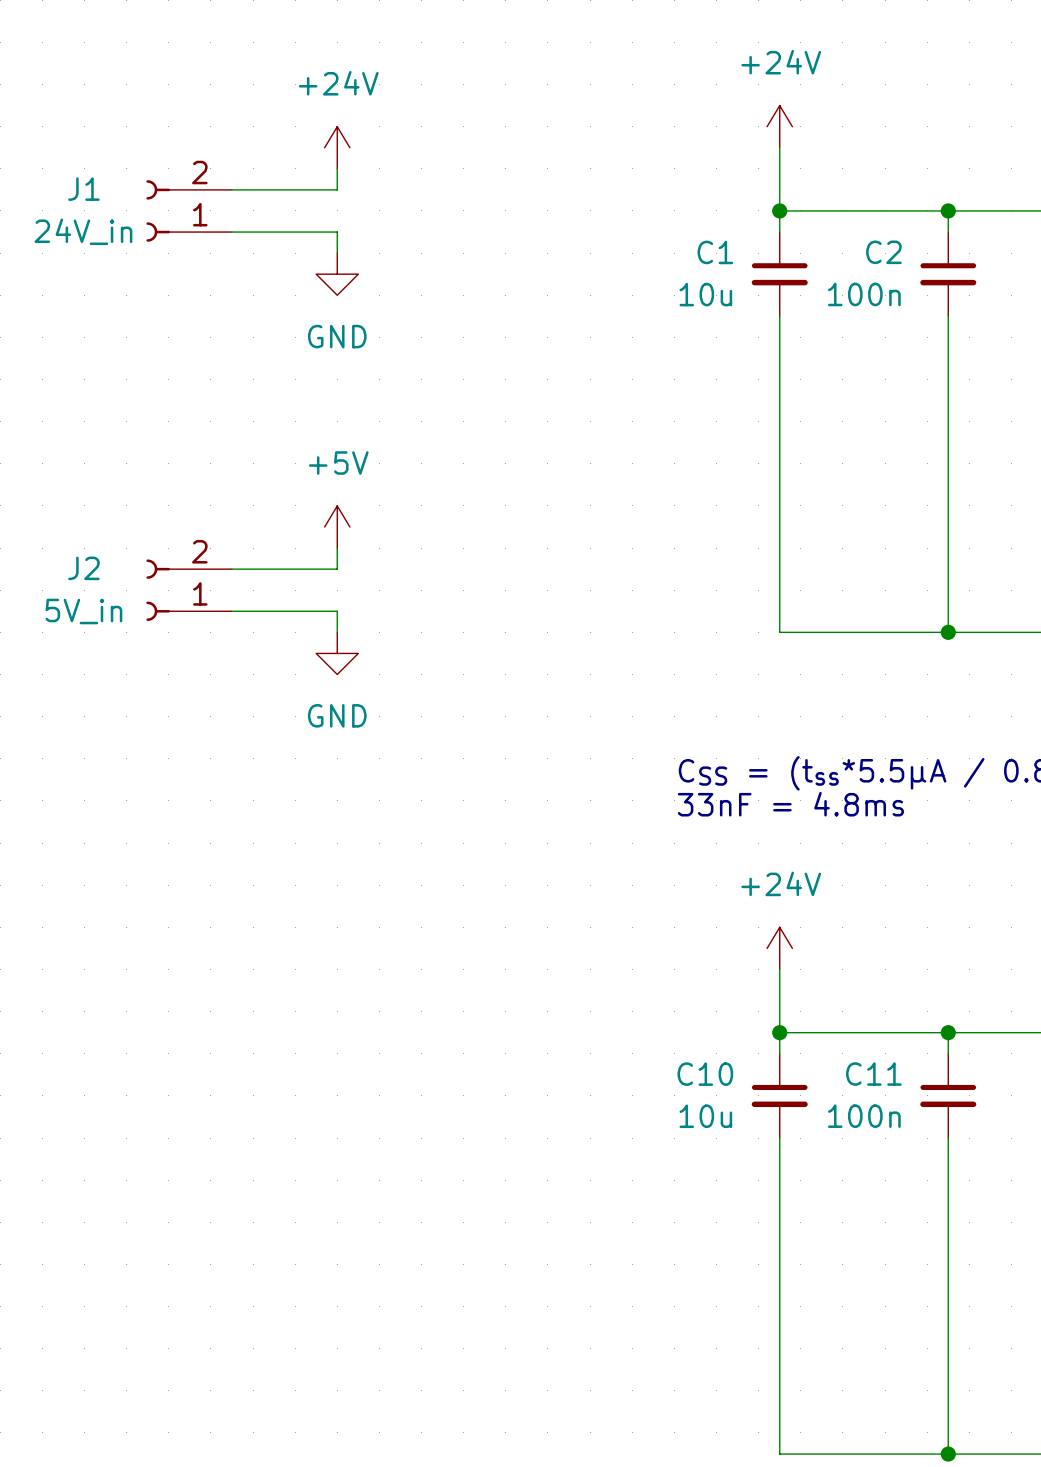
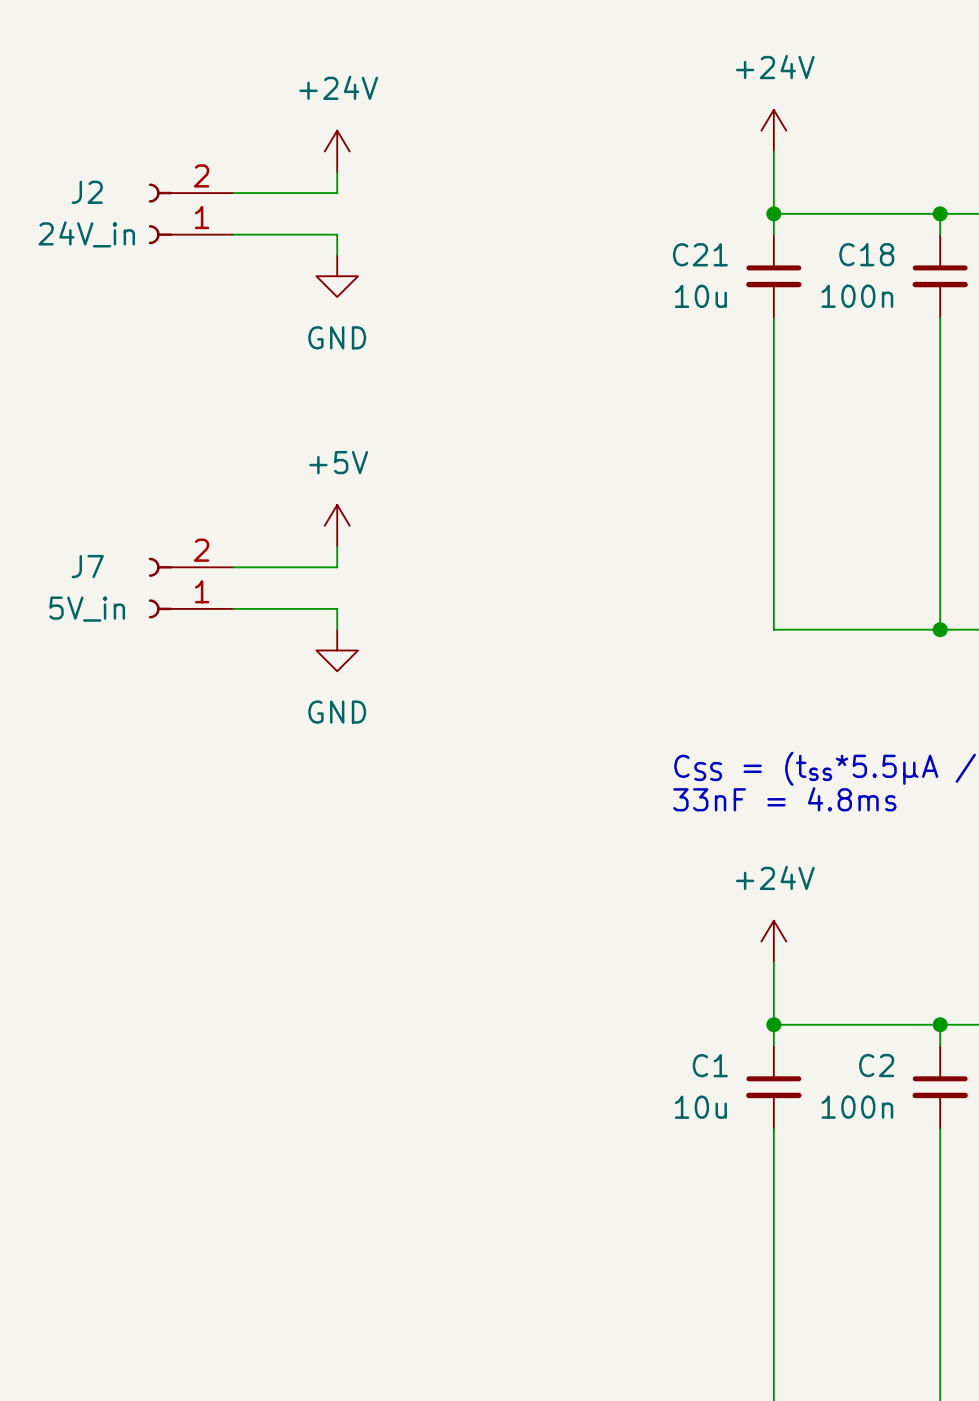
J1 name: J1 (83, 189) -> J2 (87, 192)
C1 name: C1 (715, 252) -> C21 (700, 254)
C2 name: C2 (883, 252) -> C18 (866, 254)
J2 name: J2 (83, 568) -> J7 (87, 566)
C10 name: C10 (705, 1074) -> C1 (710, 1065)
C11 name: C11 (873, 1074) -> C2 (876, 1065)

